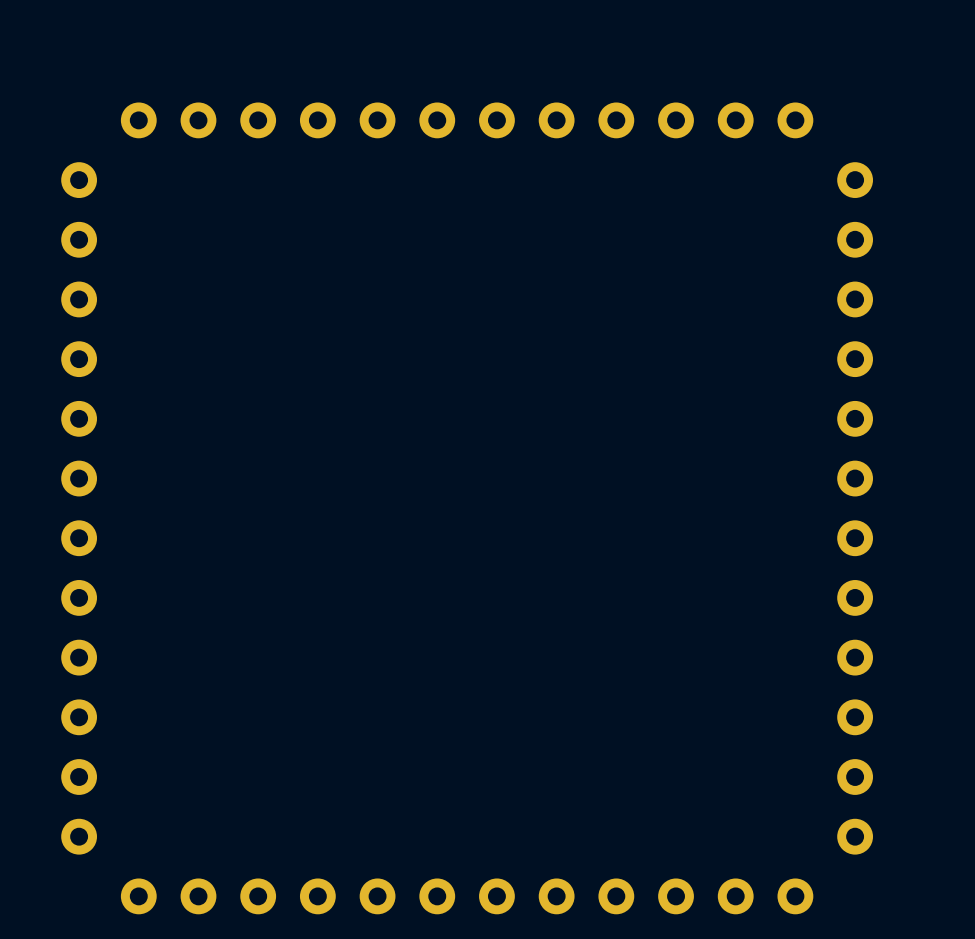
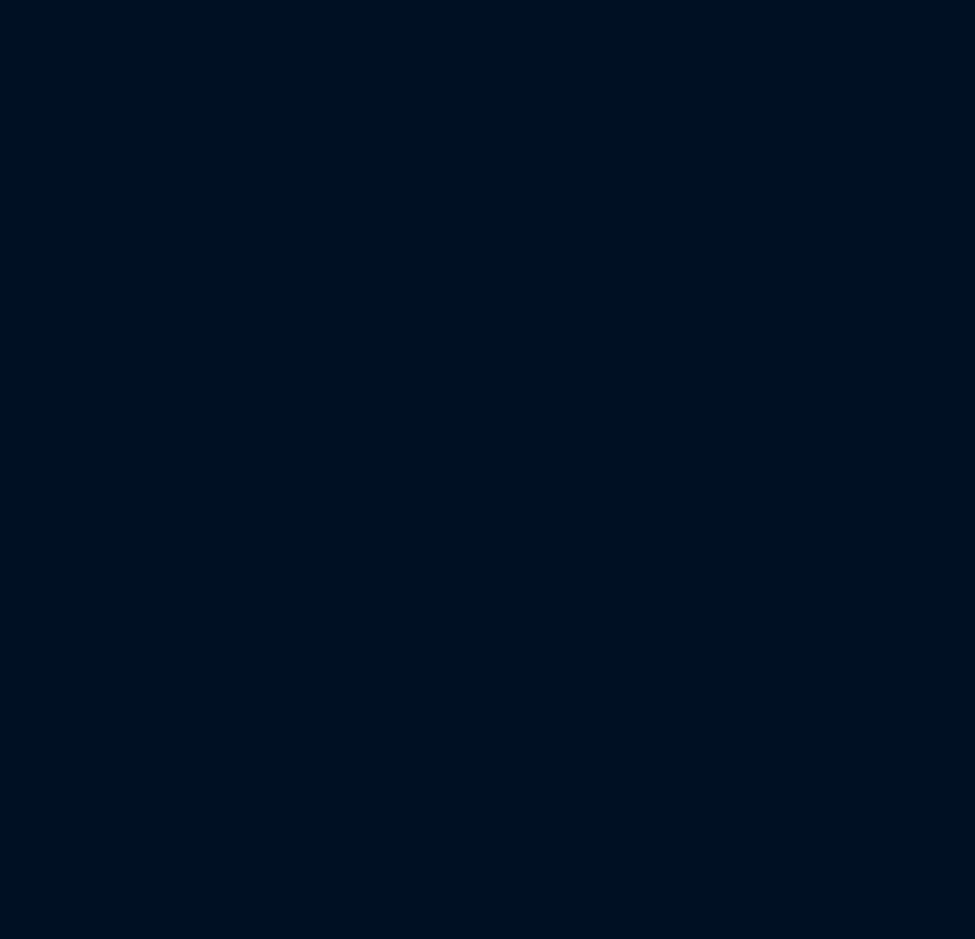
part: (467, 508) -> none

